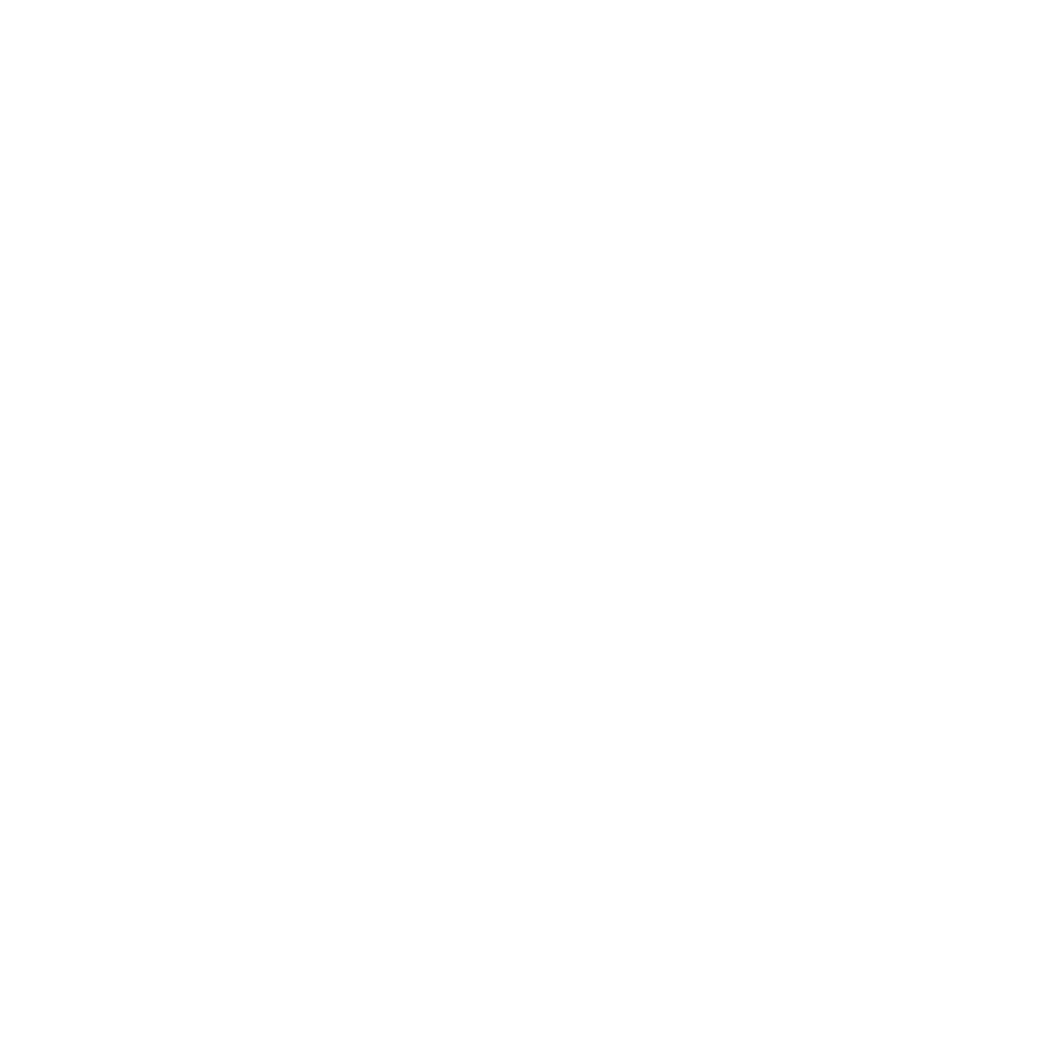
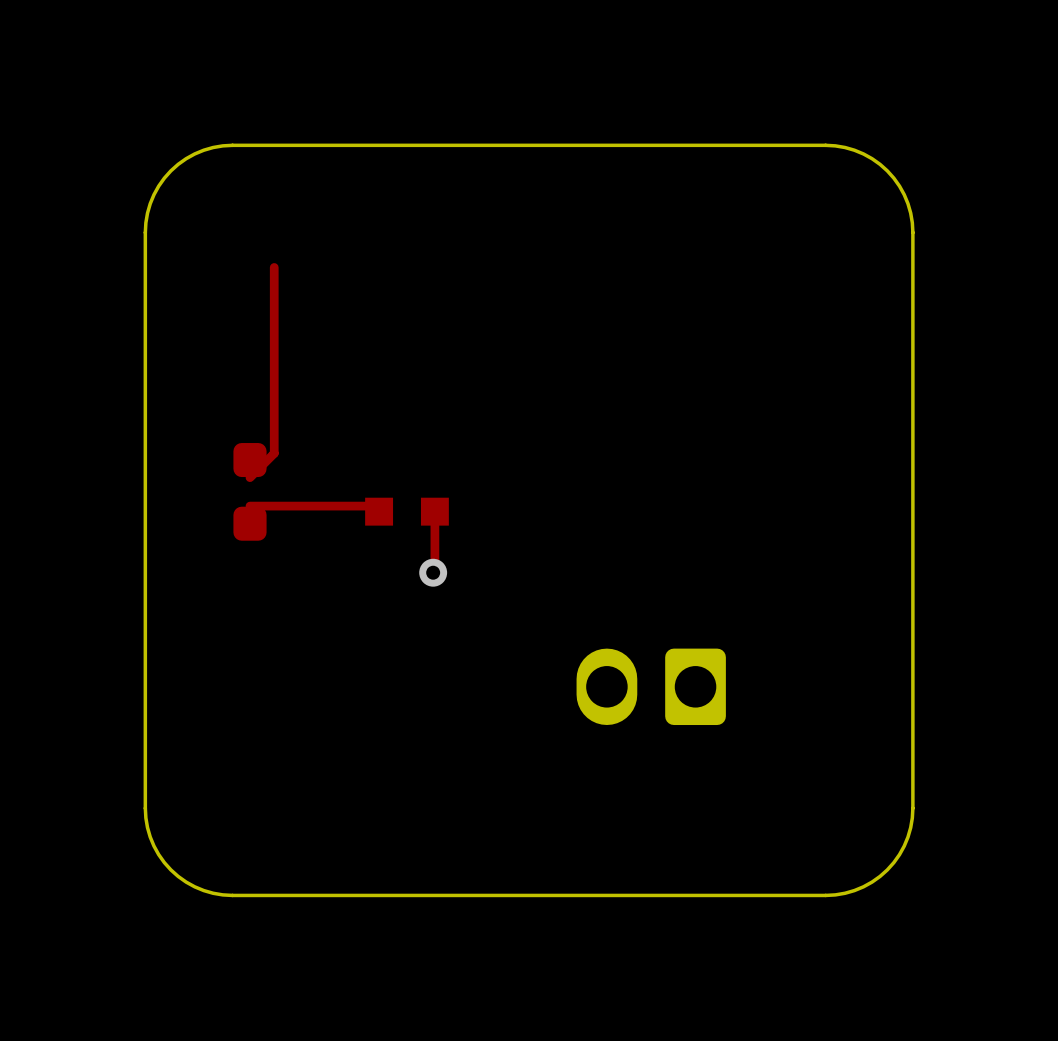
board edge: none -> (825, 145) (232, 145) (213, 147) (194, 153) (170, 170) (153, 194) (147, 213) (145, 232) (145, 808) (150, 837) (158, 854) (170, 869) (194, 886) (213, 893) (232, 895) (825, 895) (845, 893) (863, 886) (887, 869) (899, 854) (907, 837) (912, 808) (912, 222) (904, 194) (887, 170) (863, 153) (845, 147) (825, 145)
top track: none -> (274, 267) (274, 453) (250, 477)
part: none -> (250, 491)
top track: none -> (250, 506) (373, 506) (379, 511)
part: none -> (407, 511)
top track: none -> (434, 511) (434, 570) (433, 572)
via: none -> (433, 572)
part: none -> (651, 686)

